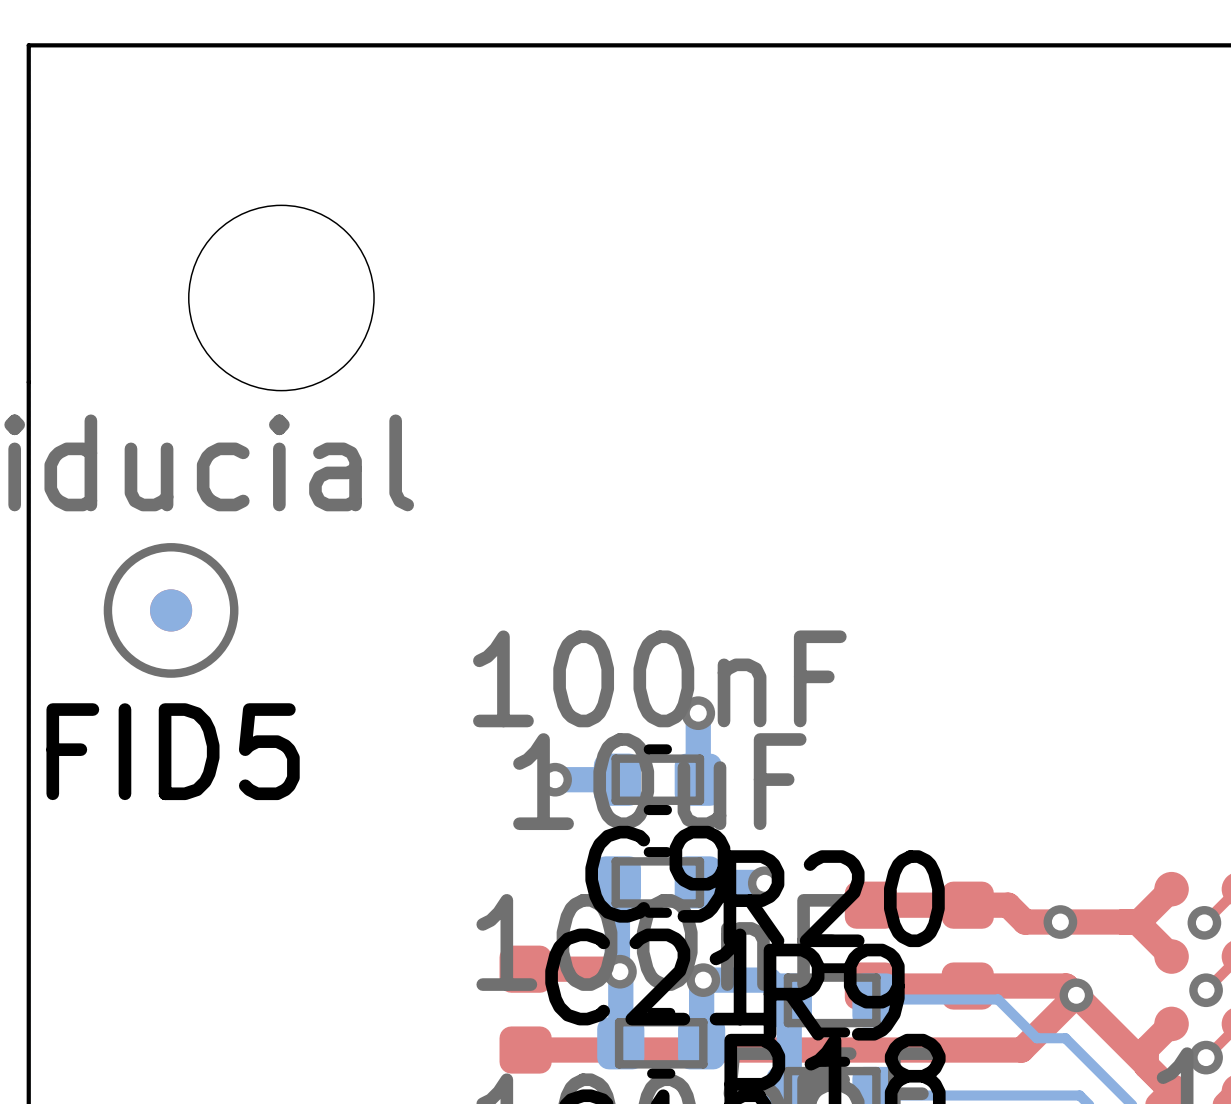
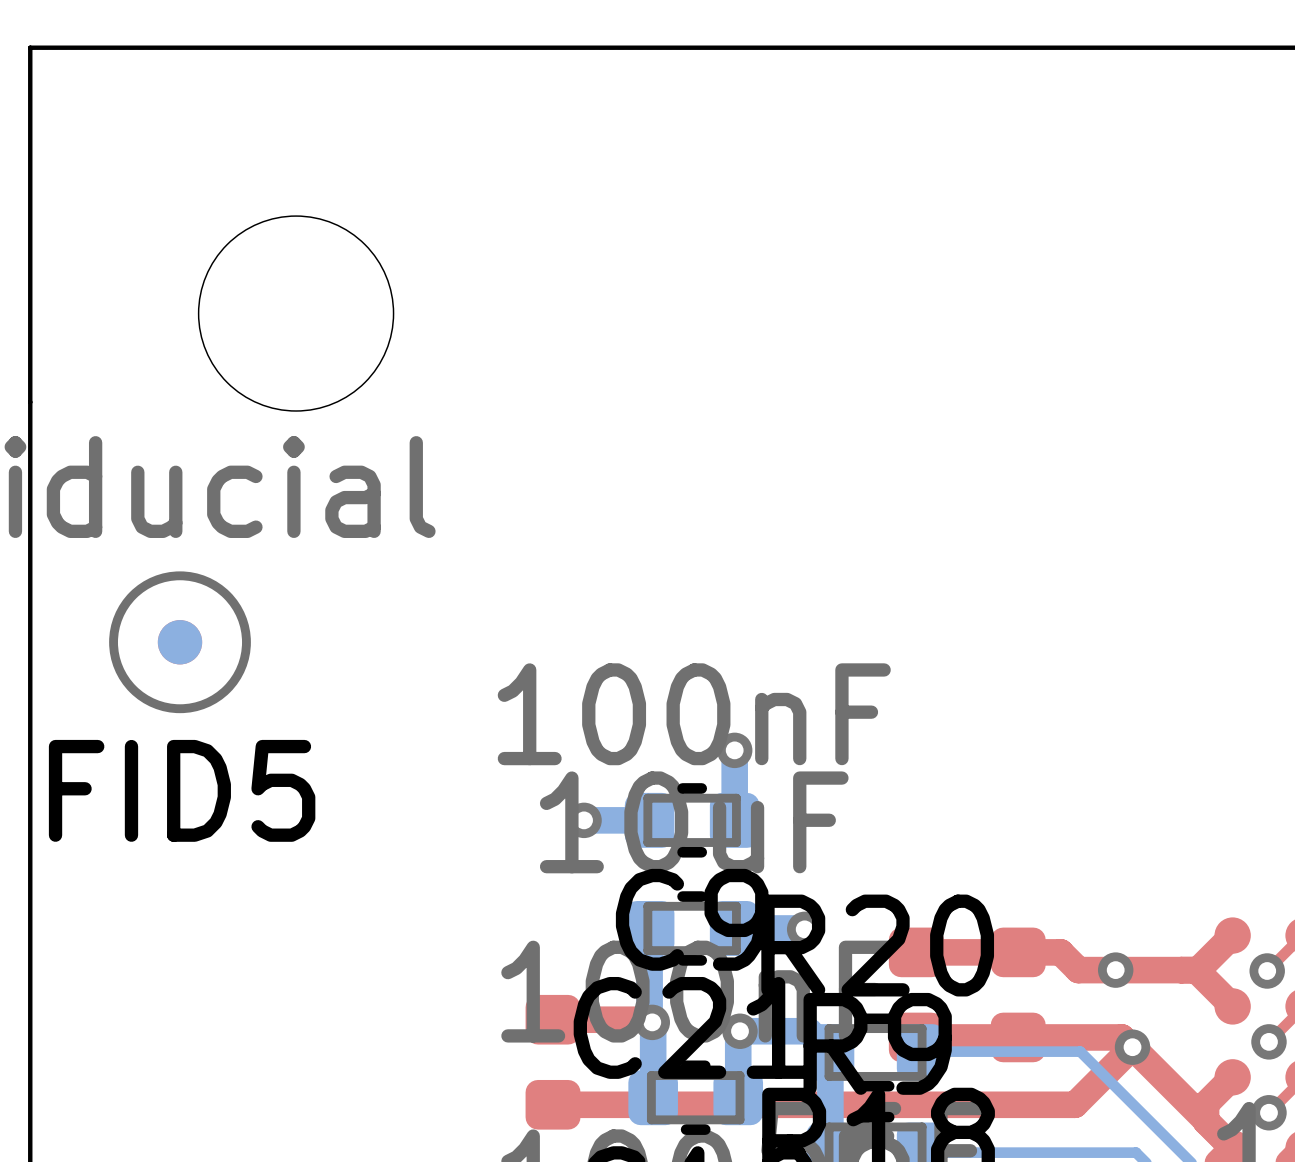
bottom track: (998, 999) (1036, 1038) (1065, 1038) -> (1050, 1051) (1080, 1051) (1121, 1092)

